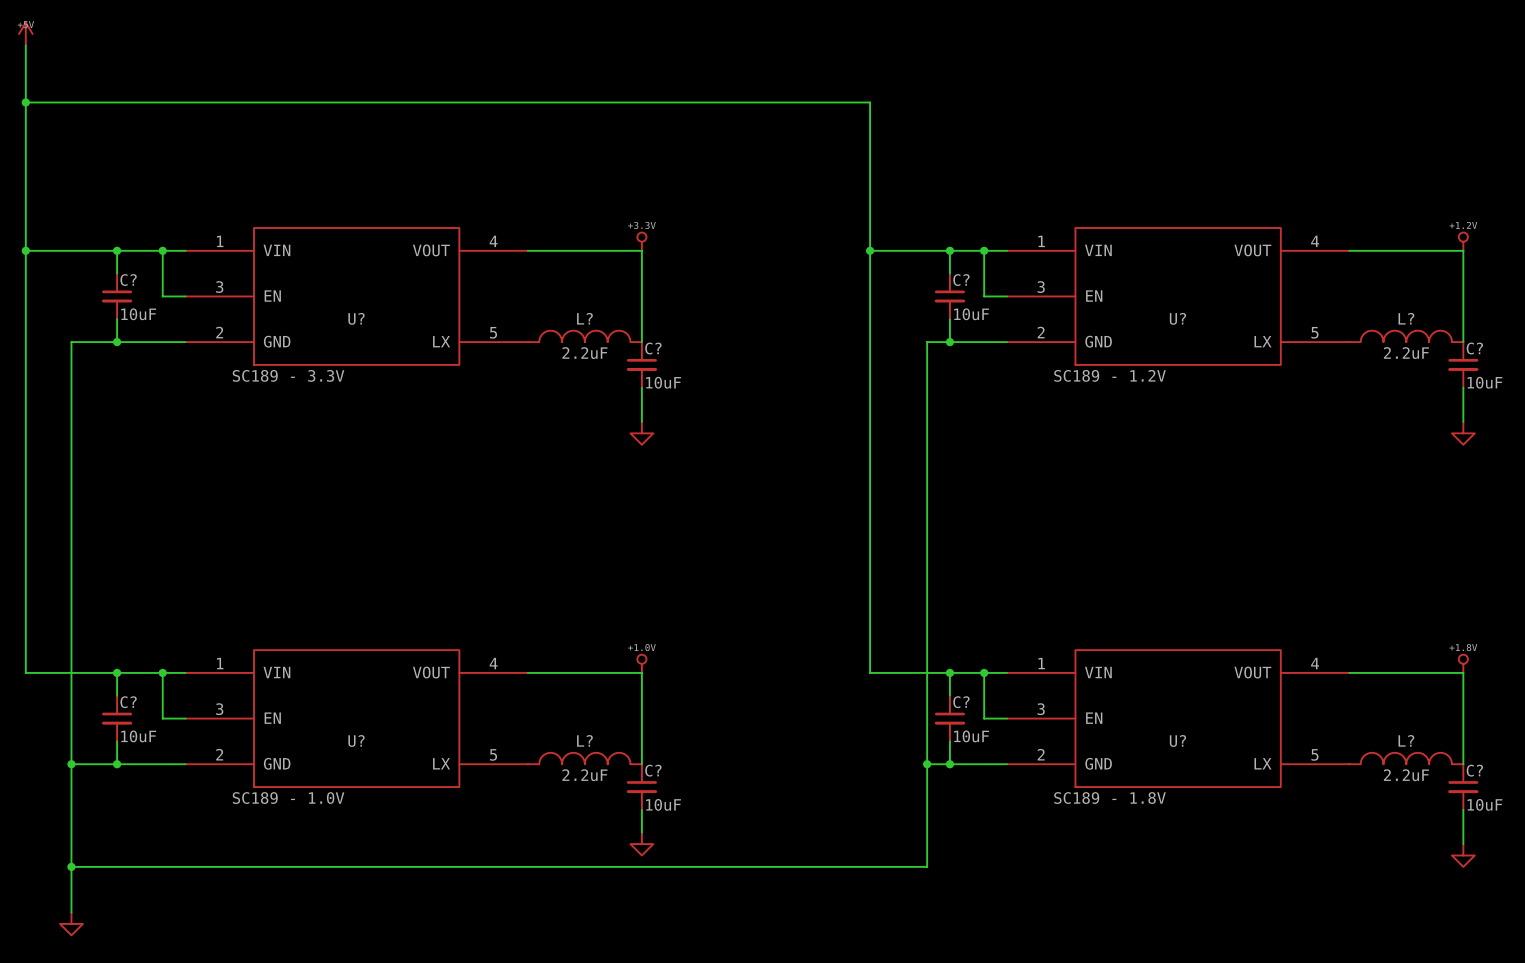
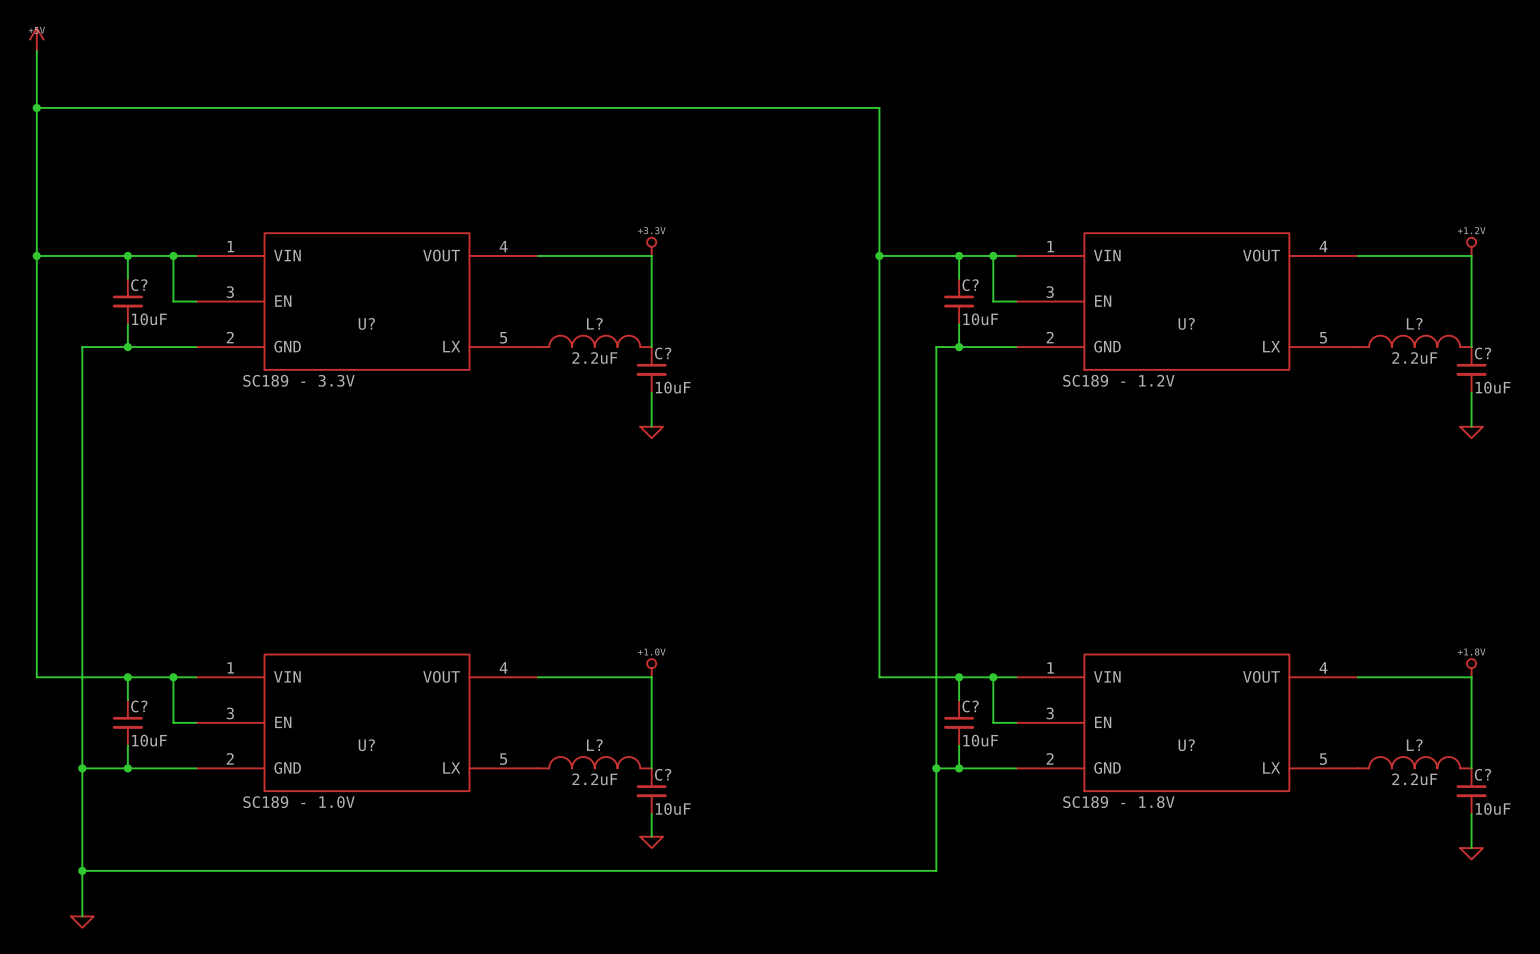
power symbol shape: [630, 421, 654, 445] -> [640, 426, 664, 439]
power symbol shape: [1451, 421, 1475, 445] -> [1460, 426, 1483, 439]
power symbol shape: [630, 832, 654, 856] -> [640, 836, 664, 849]
power symbol shape: [1451, 844, 1475, 867] -> [1460, 848, 1483, 860]
power symbol shape: [60, 912, 83, 936] -> [70, 916, 94, 928]

